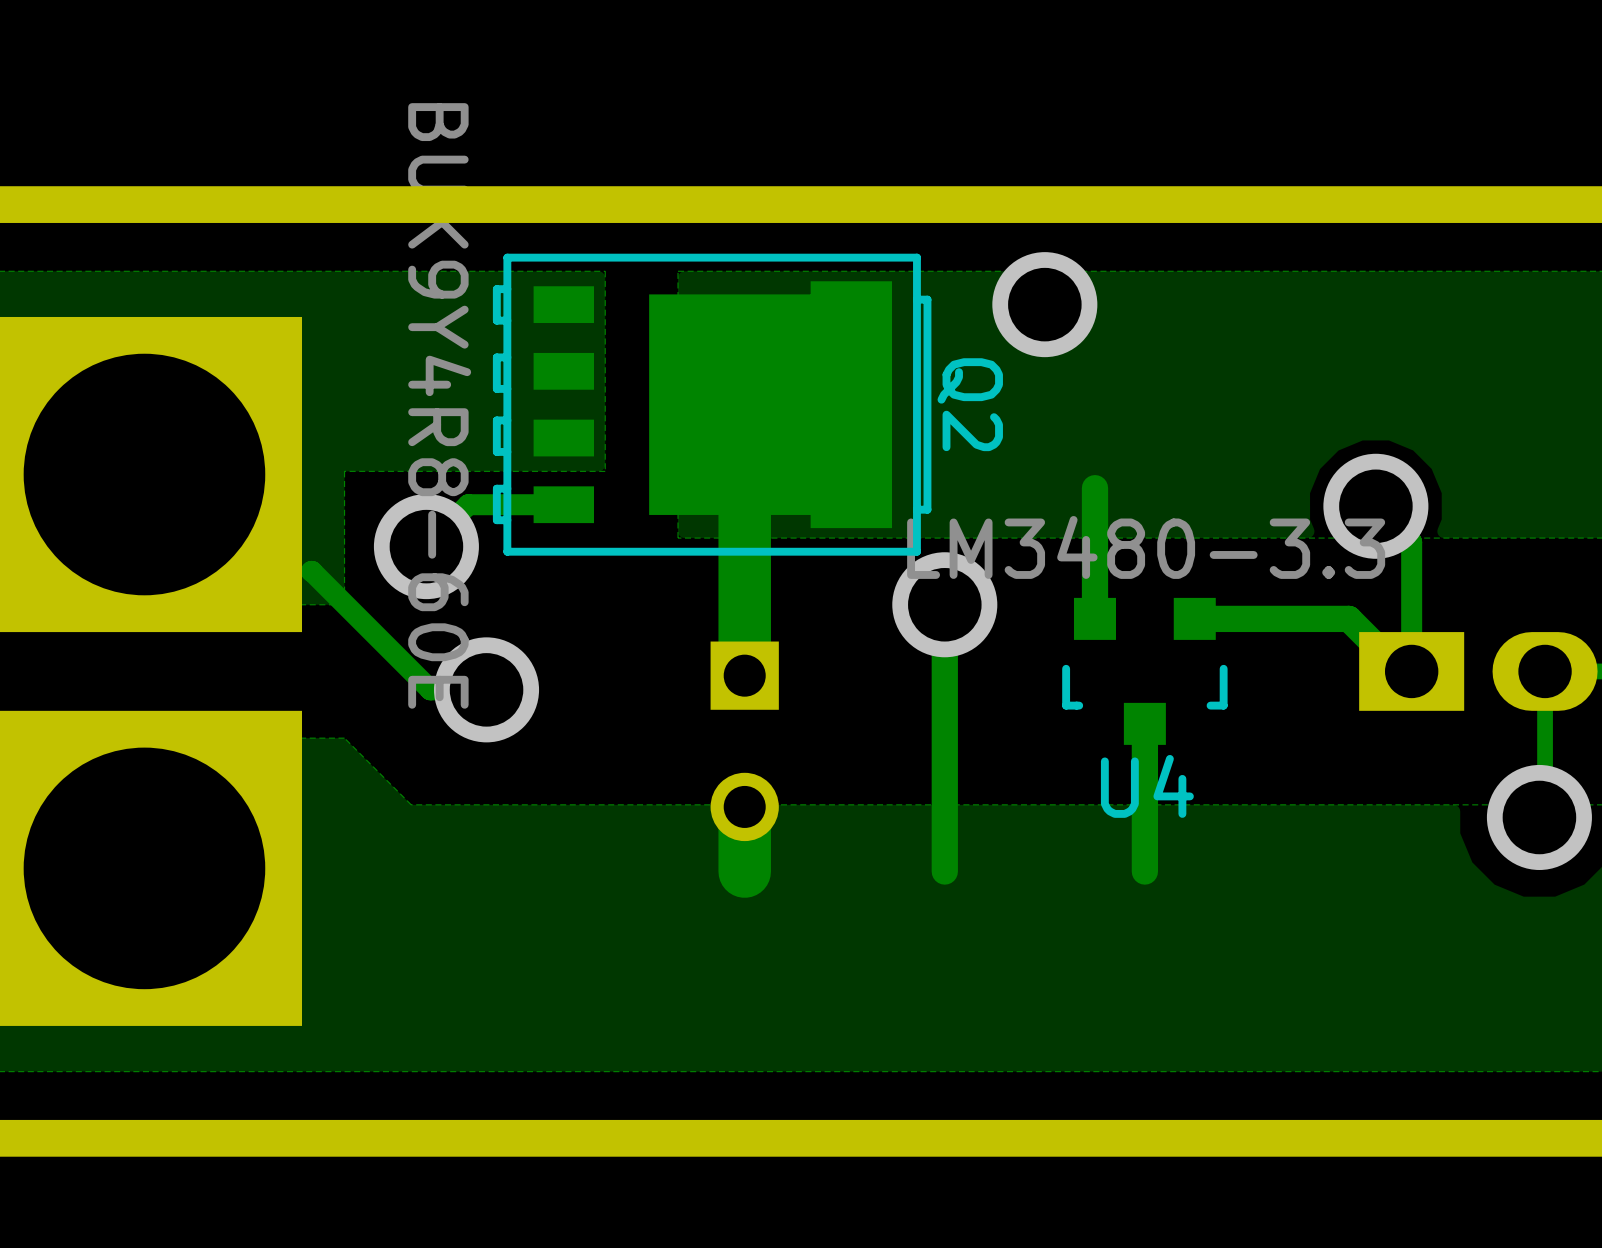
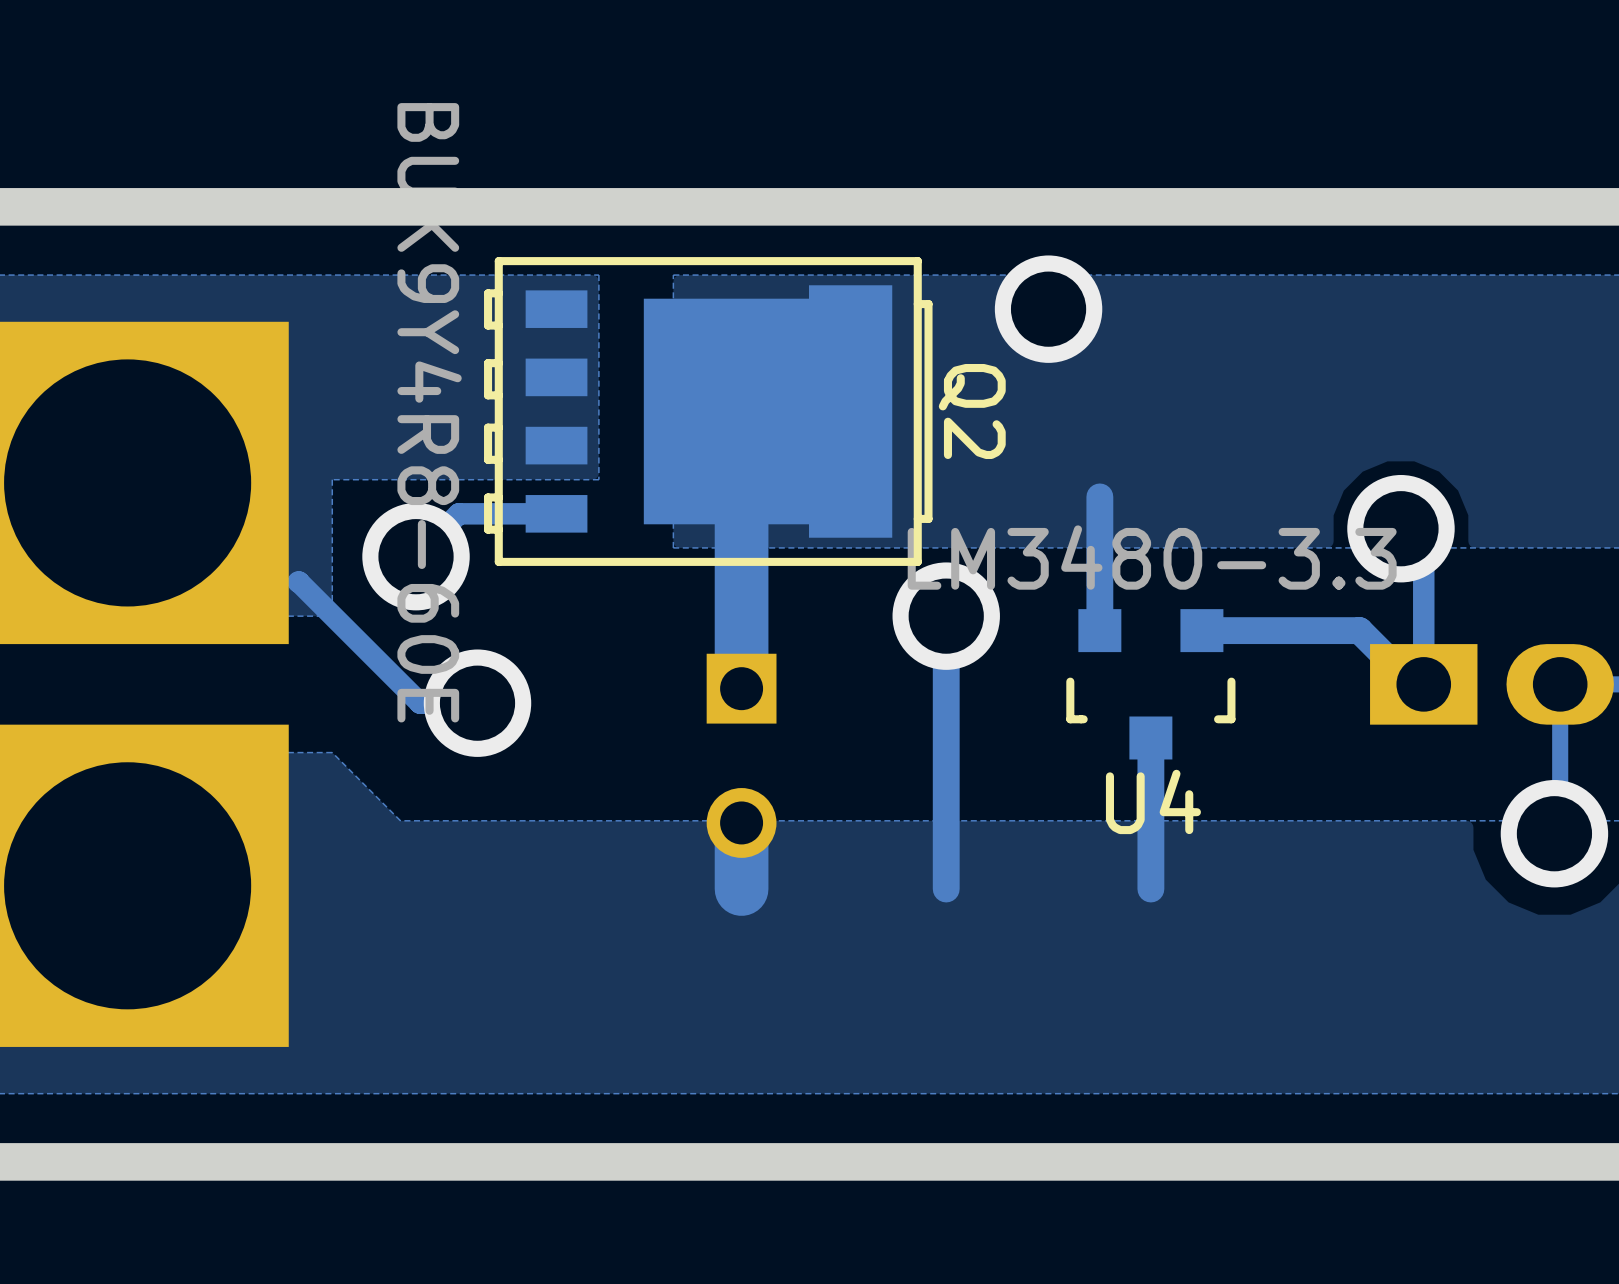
via position: (1375, 506) -> (1400, 528)

